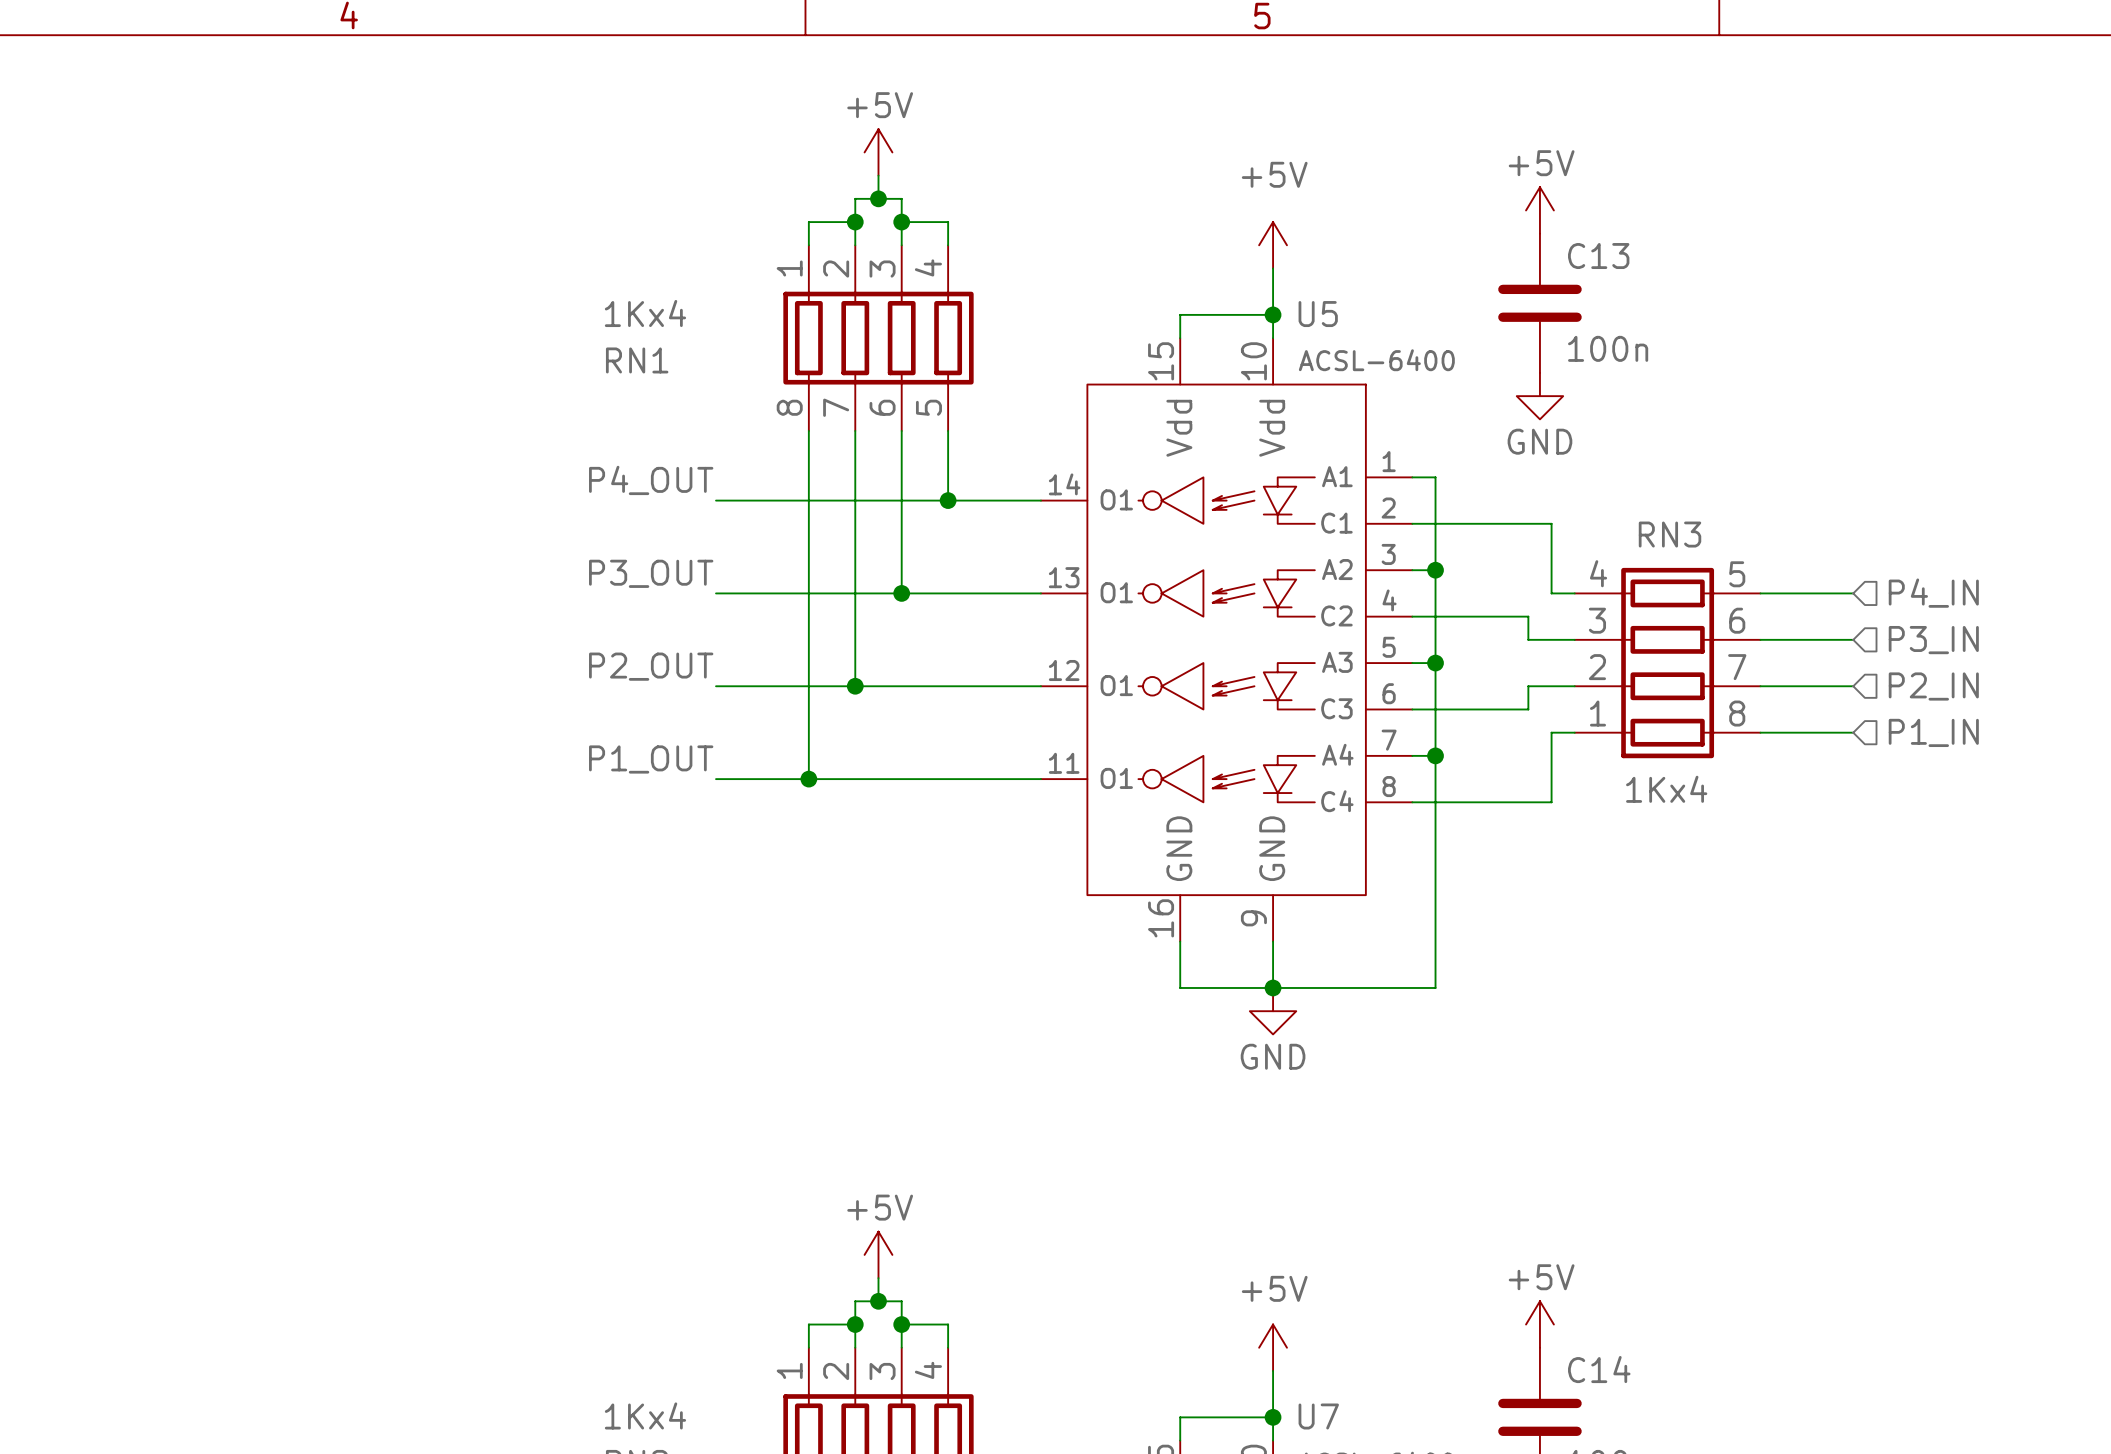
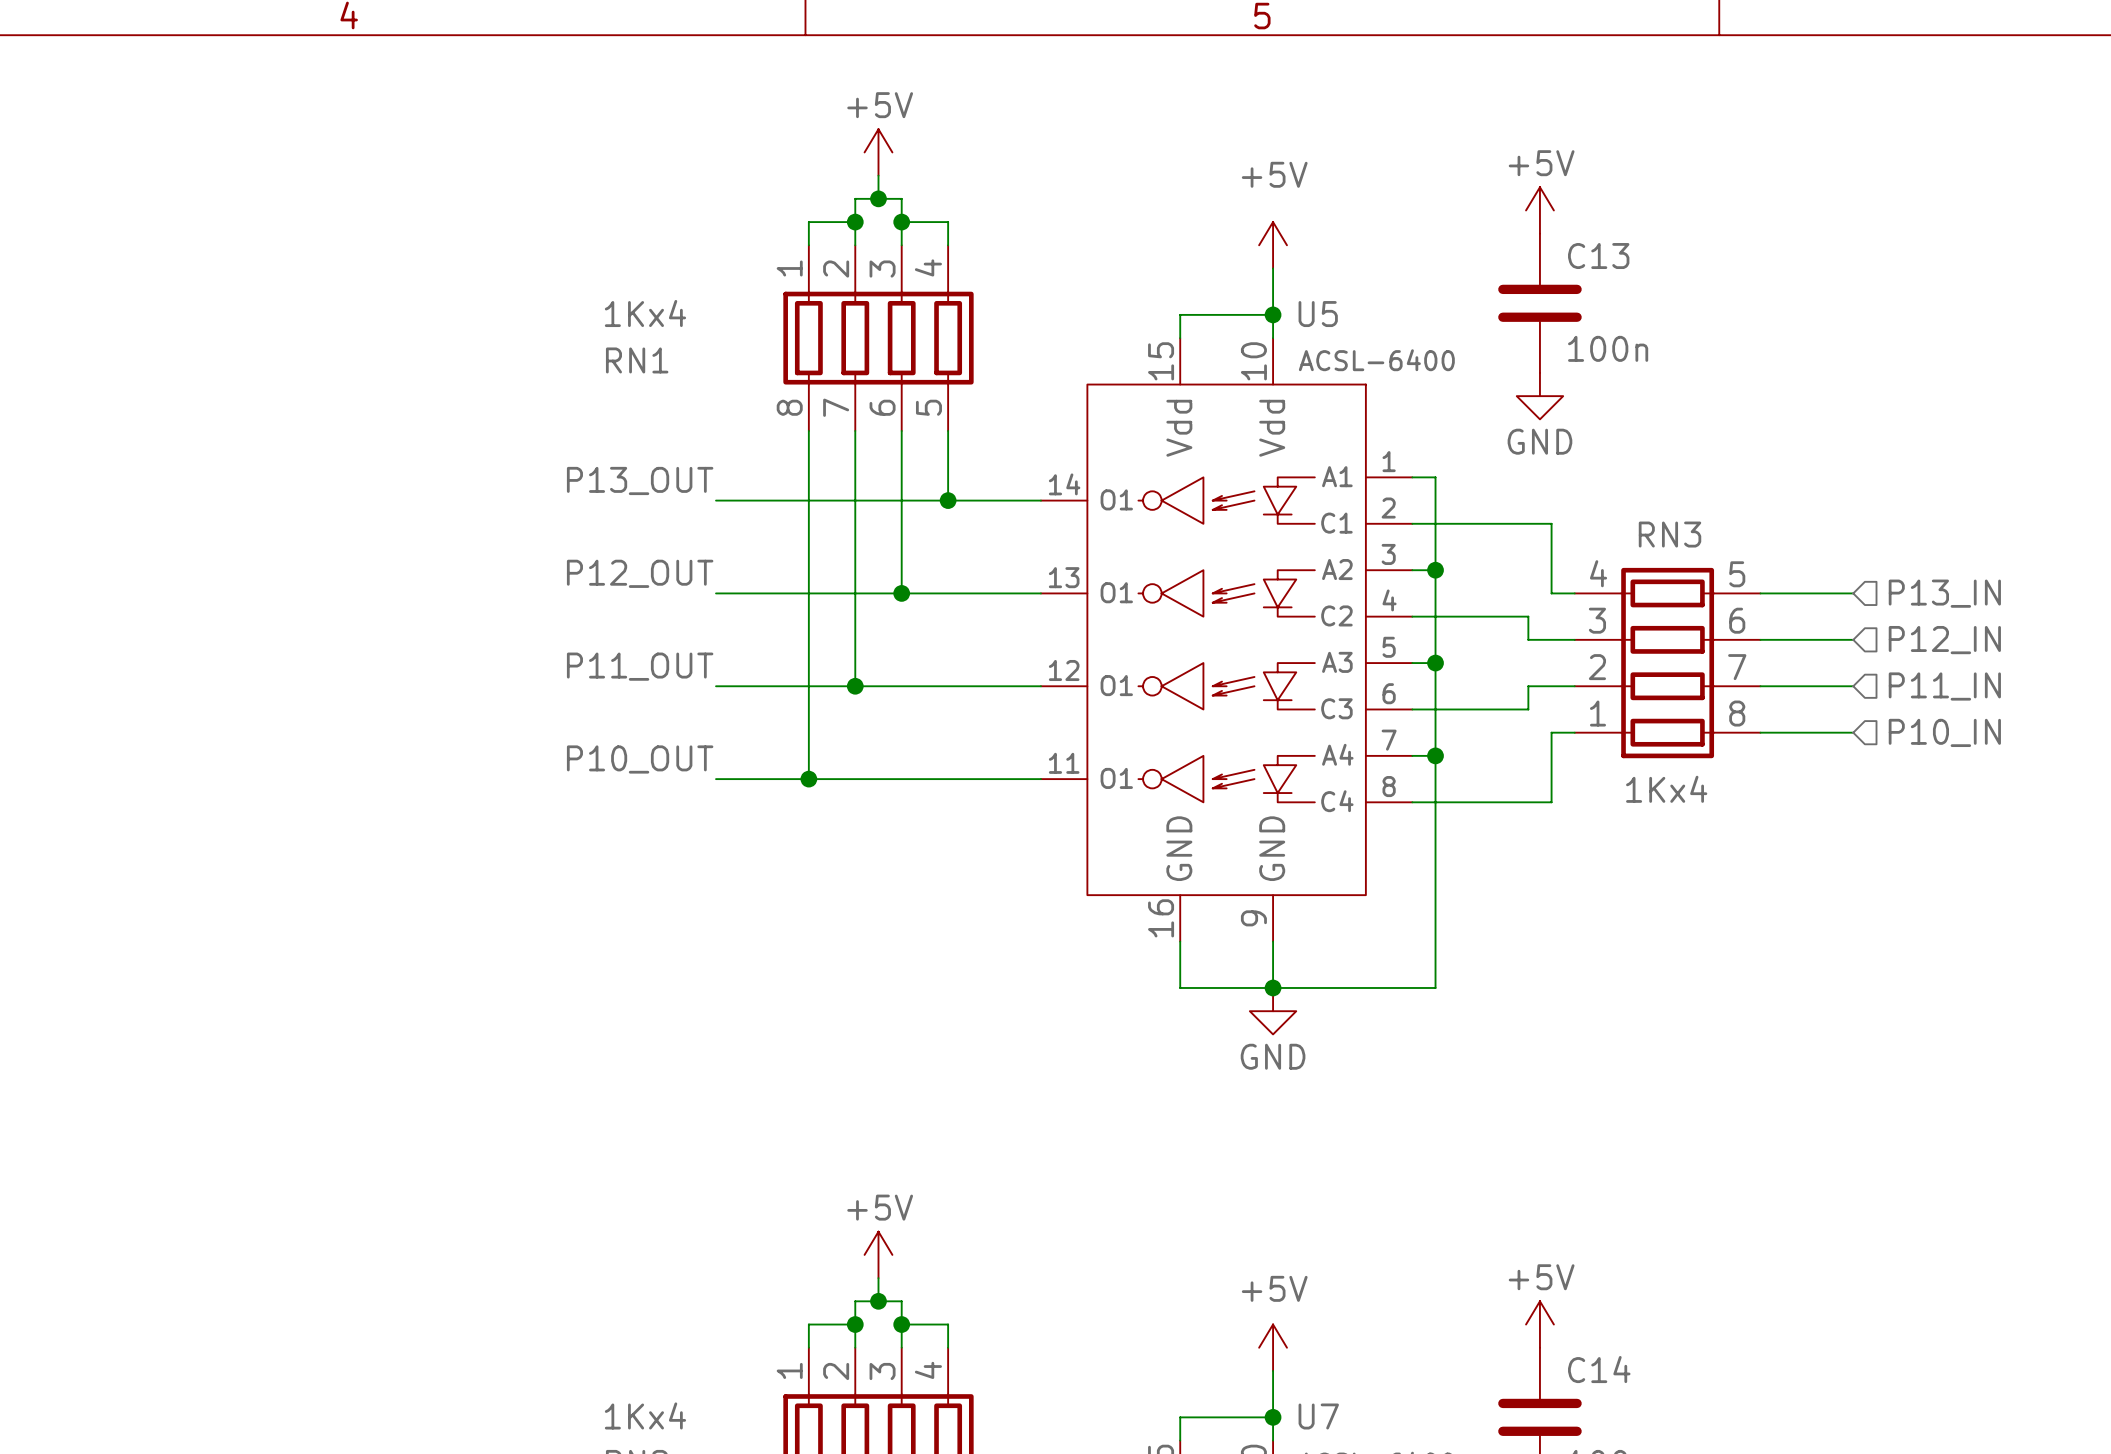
label: P4_OUT (651, 480) -> P13_OUT (640, 480)
label: P3_OUT (651, 573) -> P12_OUT (640, 573)
hierarchical label: P4_IN (1933, 593) -> P13_IN (1944, 593)
hierarchical label: P3_IN (1933, 640) -> P12_IN (1944, 640)
label: P2_OUT (651, 666) -> P11_OUT (640, 666)
hierarchical label: P2_IN (1933, 686) -> P11_IN (1944, 686)
hierarchical label: P1_IN (1933, 732) -> P10_IN (1944, 732)
label: P1_OUT (651, 759) -> P10_OUT (640, 759)

